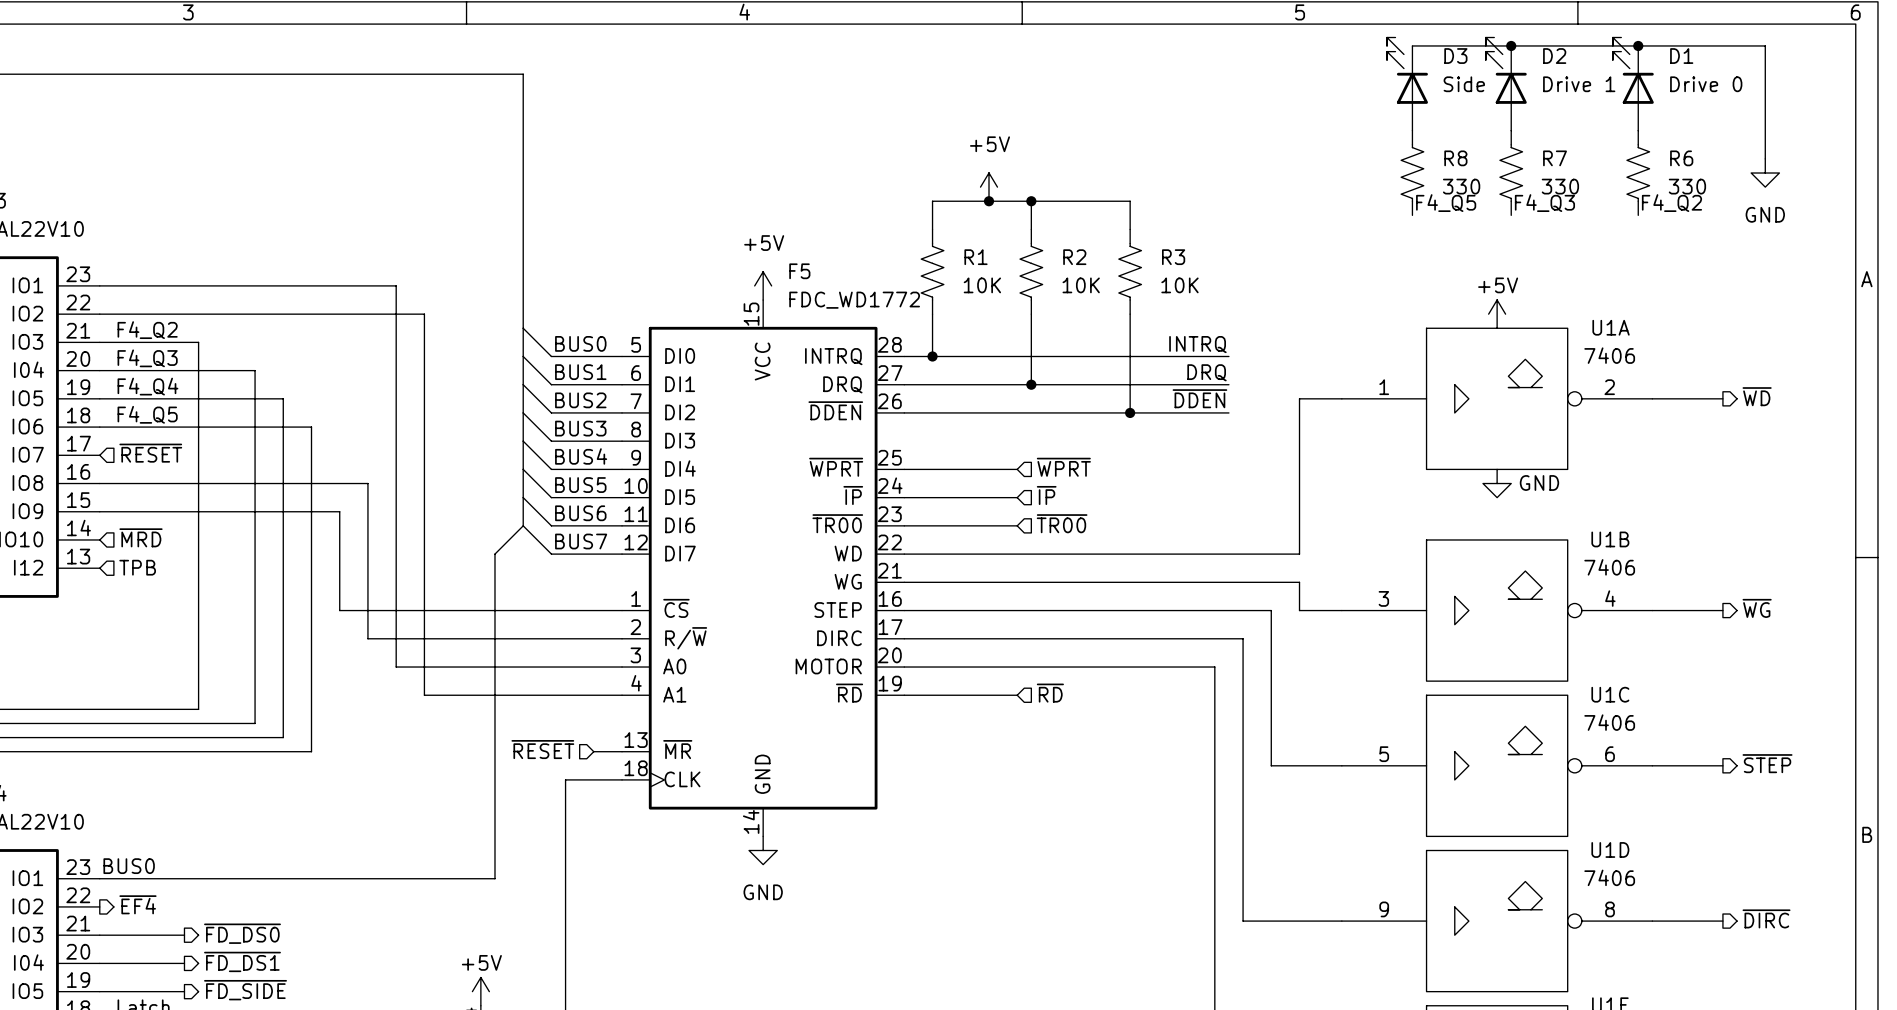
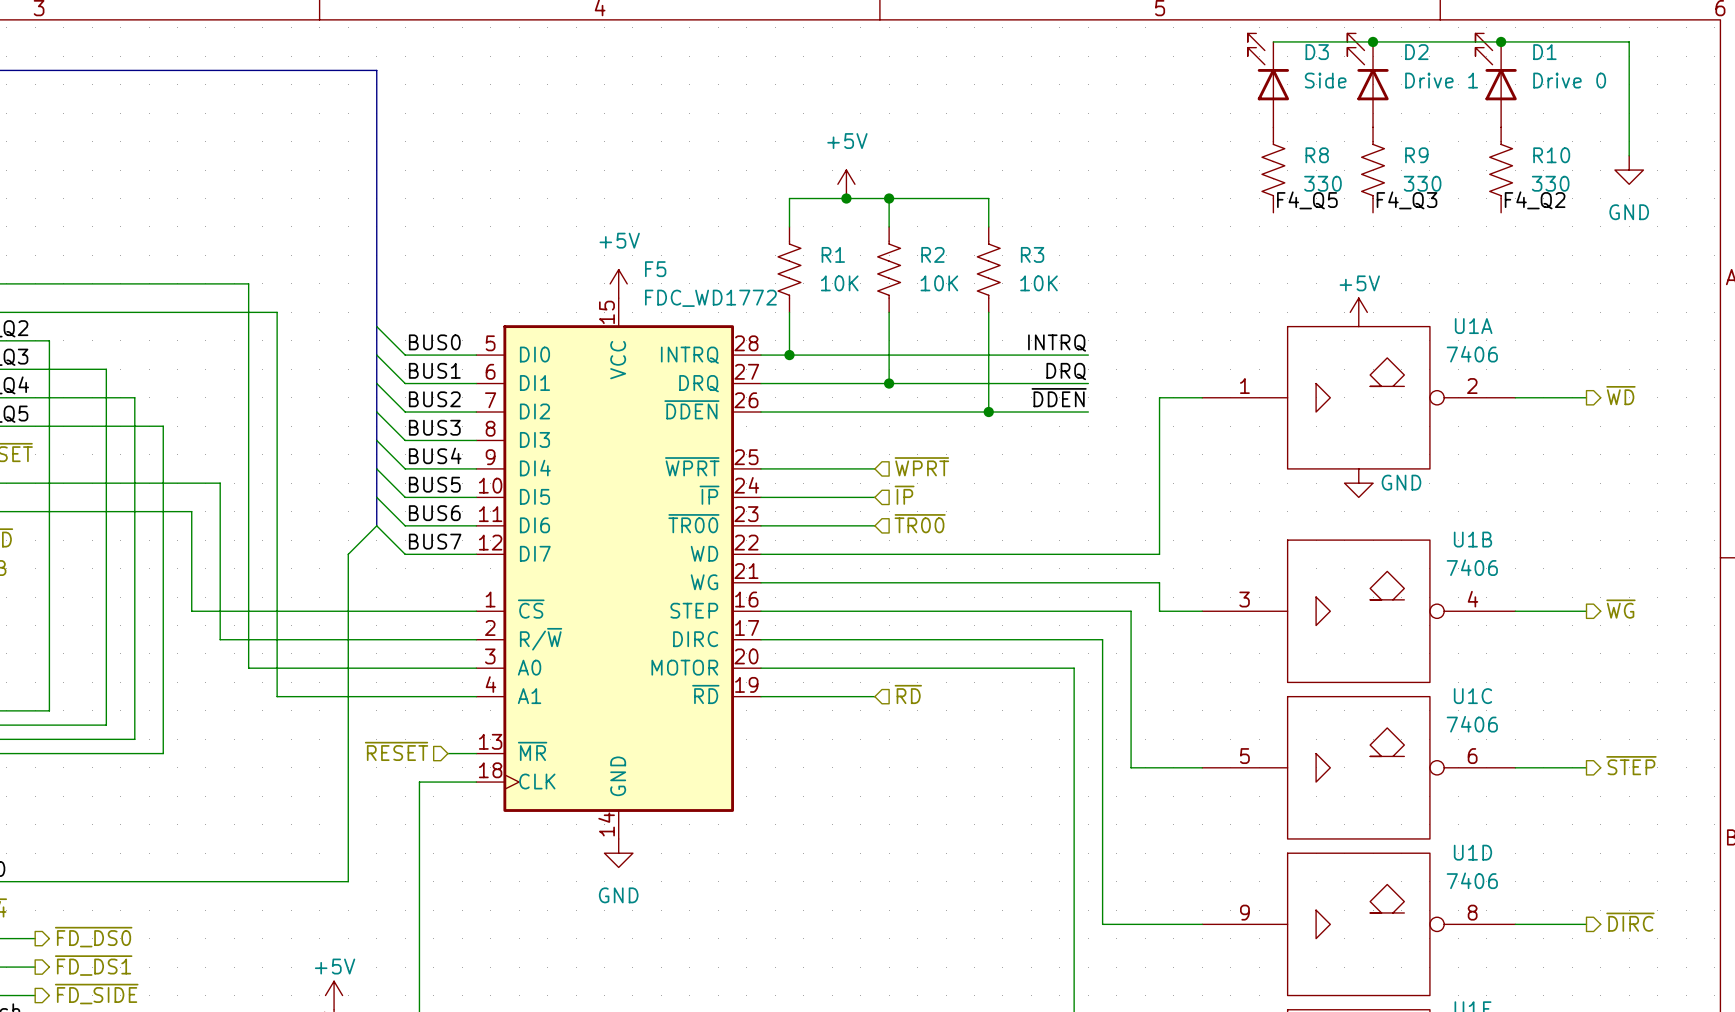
R7 name: R7 (1555, 158) -> R9 (1416, 155)
R6 name: R6 (1681, 158) -> R10 (1551, 155)

